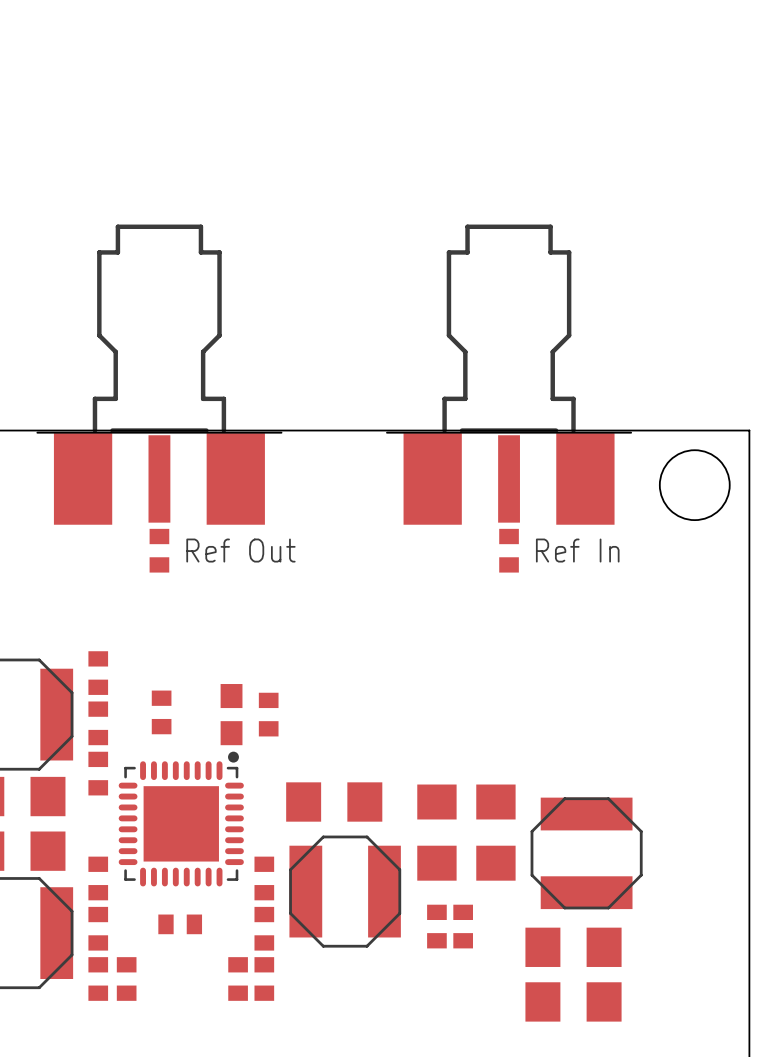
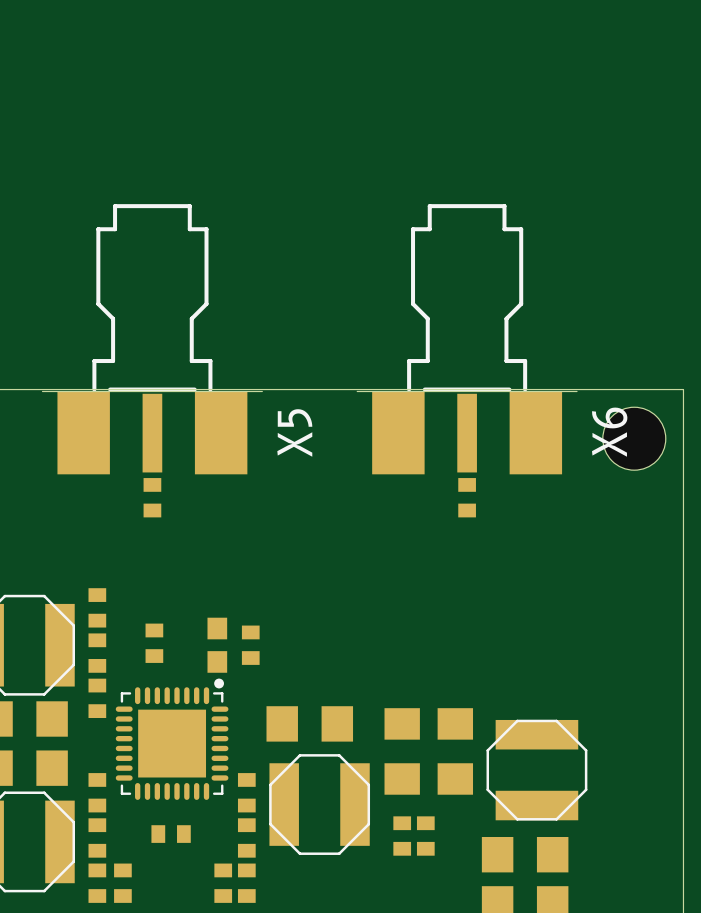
X5 name: none -> X5 (294, 432)
X6 name: none -> X6 (609, 432)
text: Ref Out (240, 550) -> none
text: Ref In (577, 550) -> none

